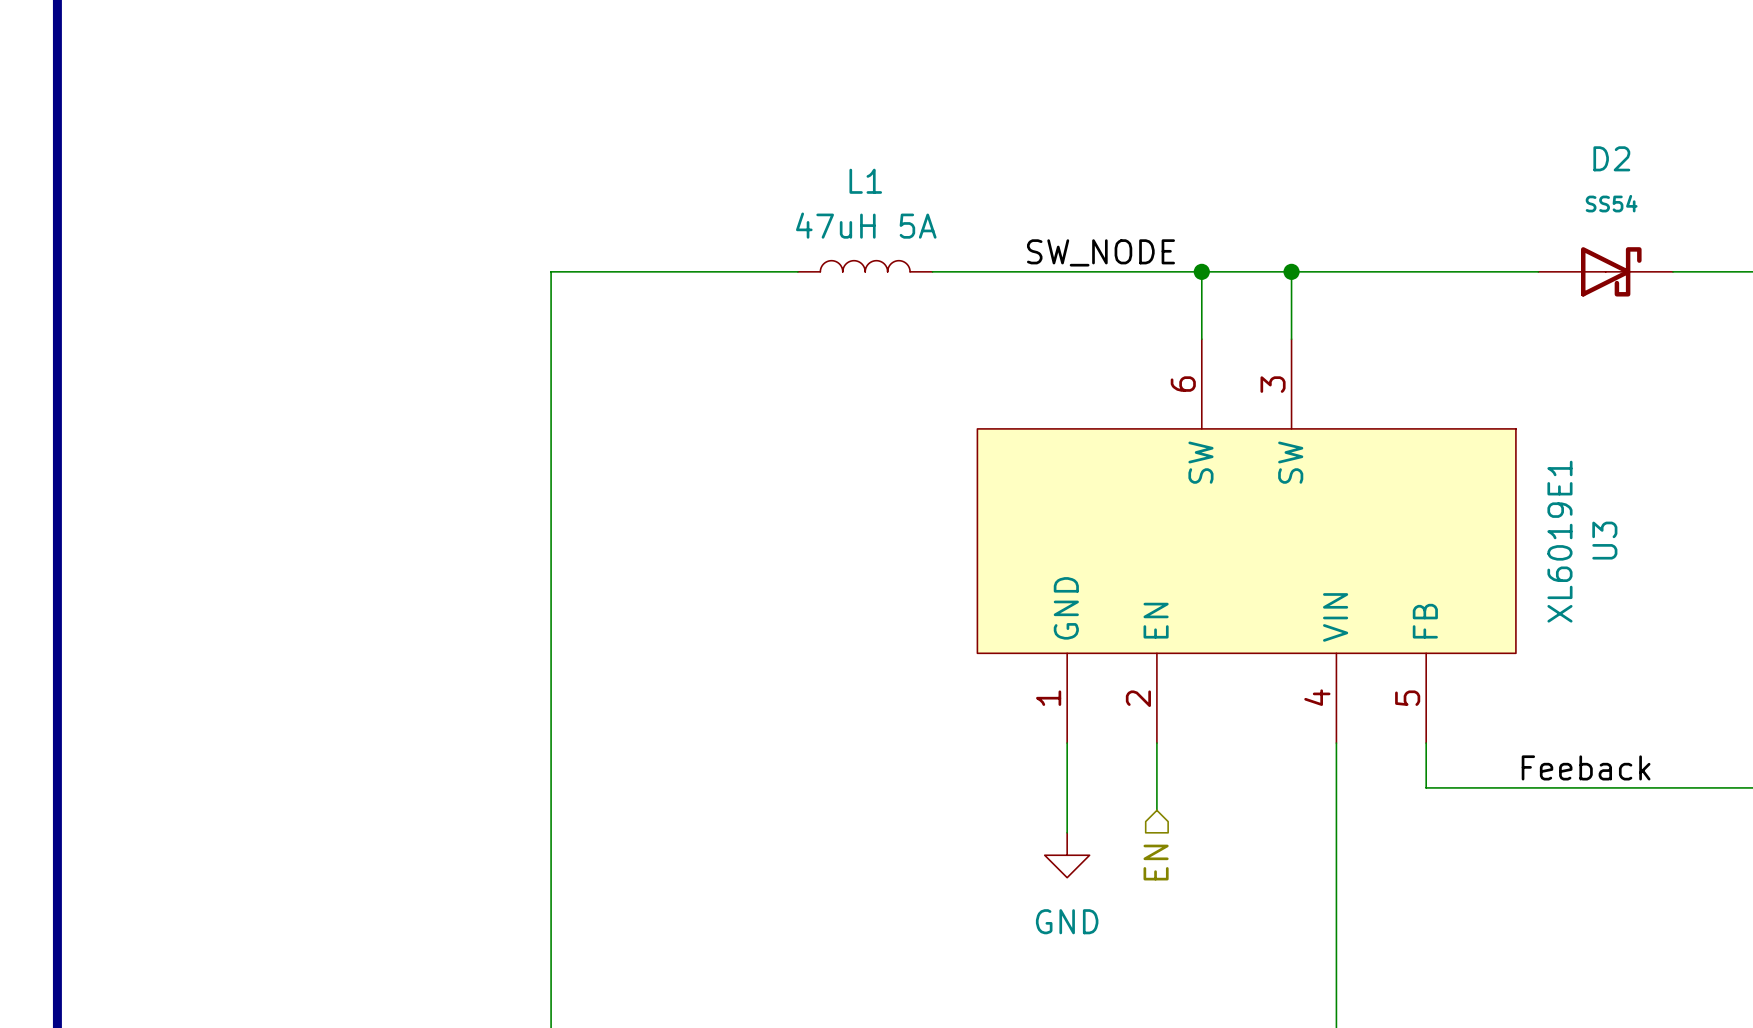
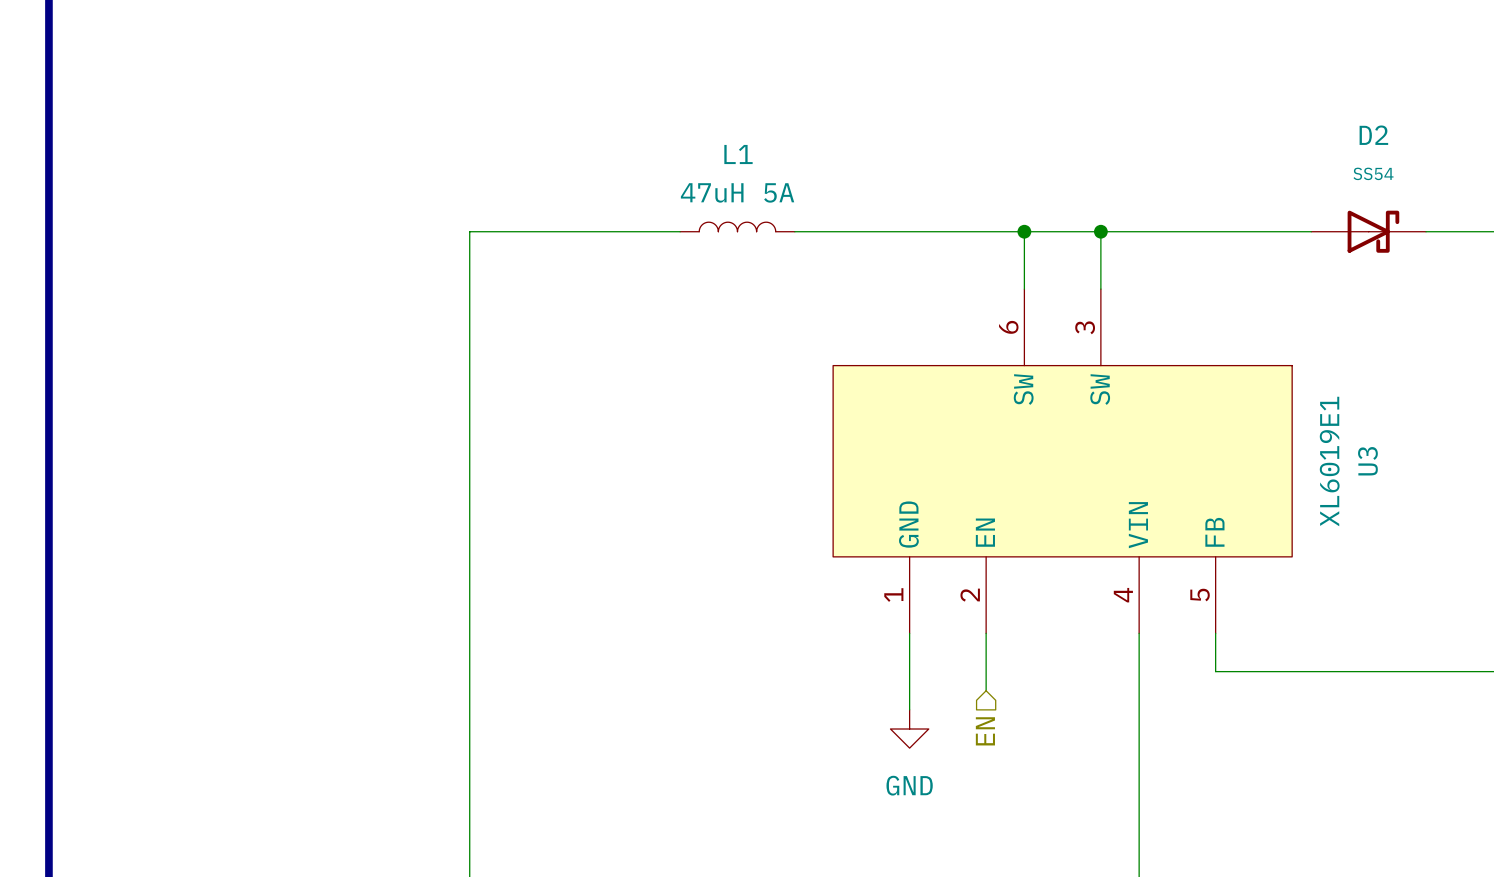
label: SW_NODE (1100, 252) -> none
label: Feeback (1586, 767) -> none

